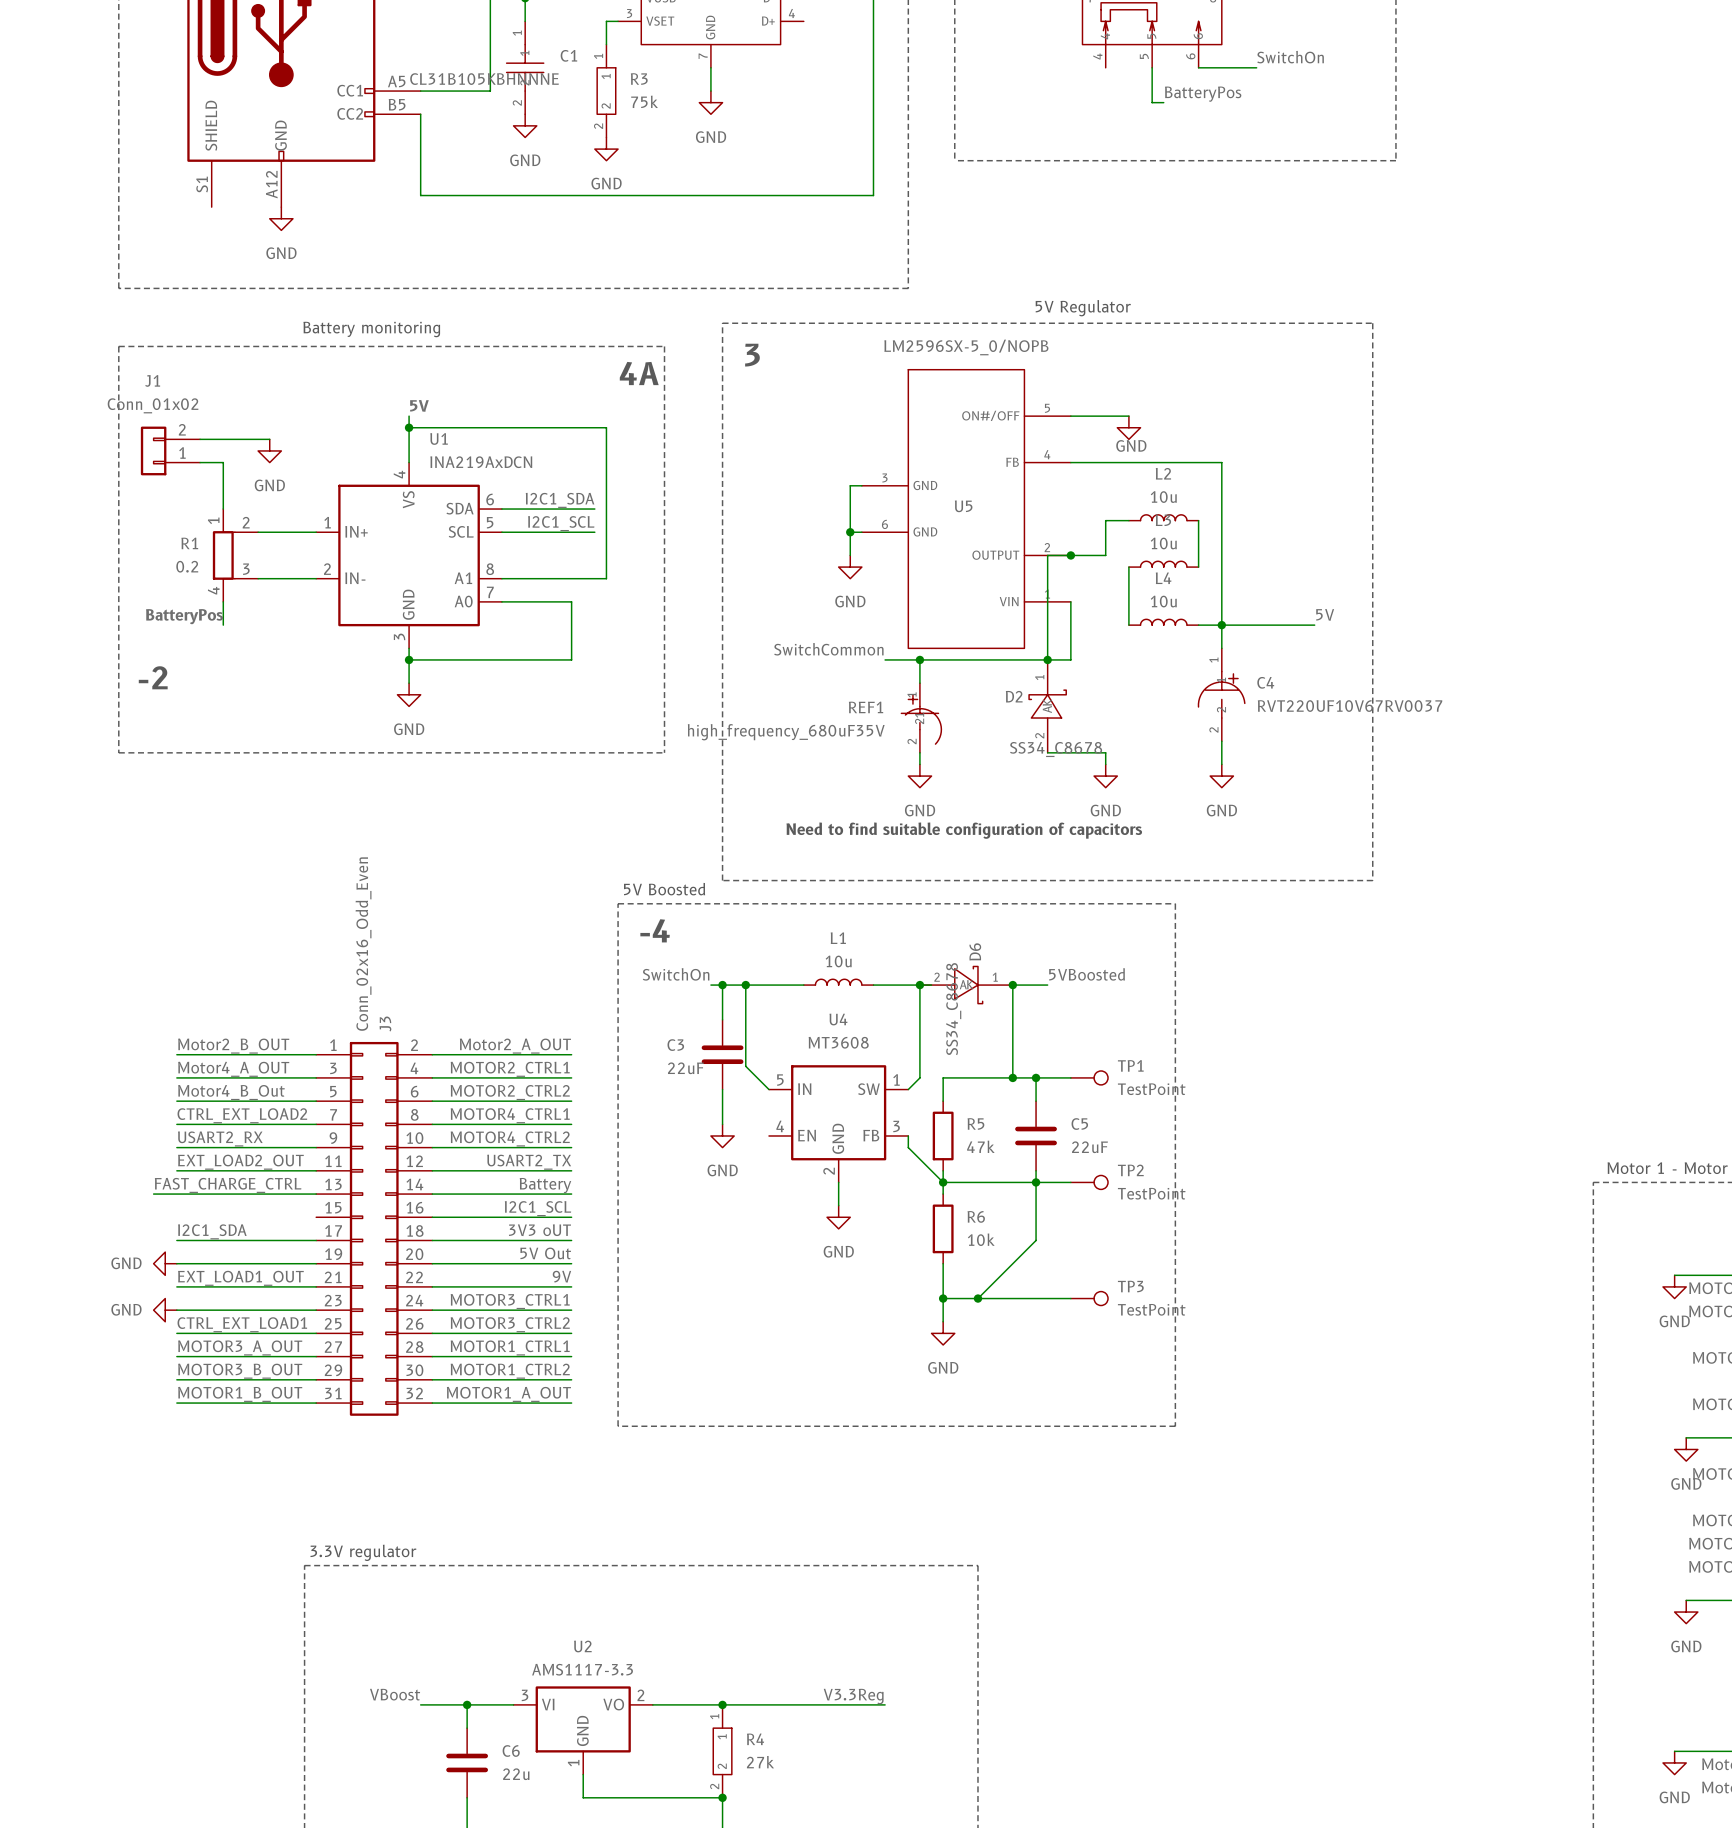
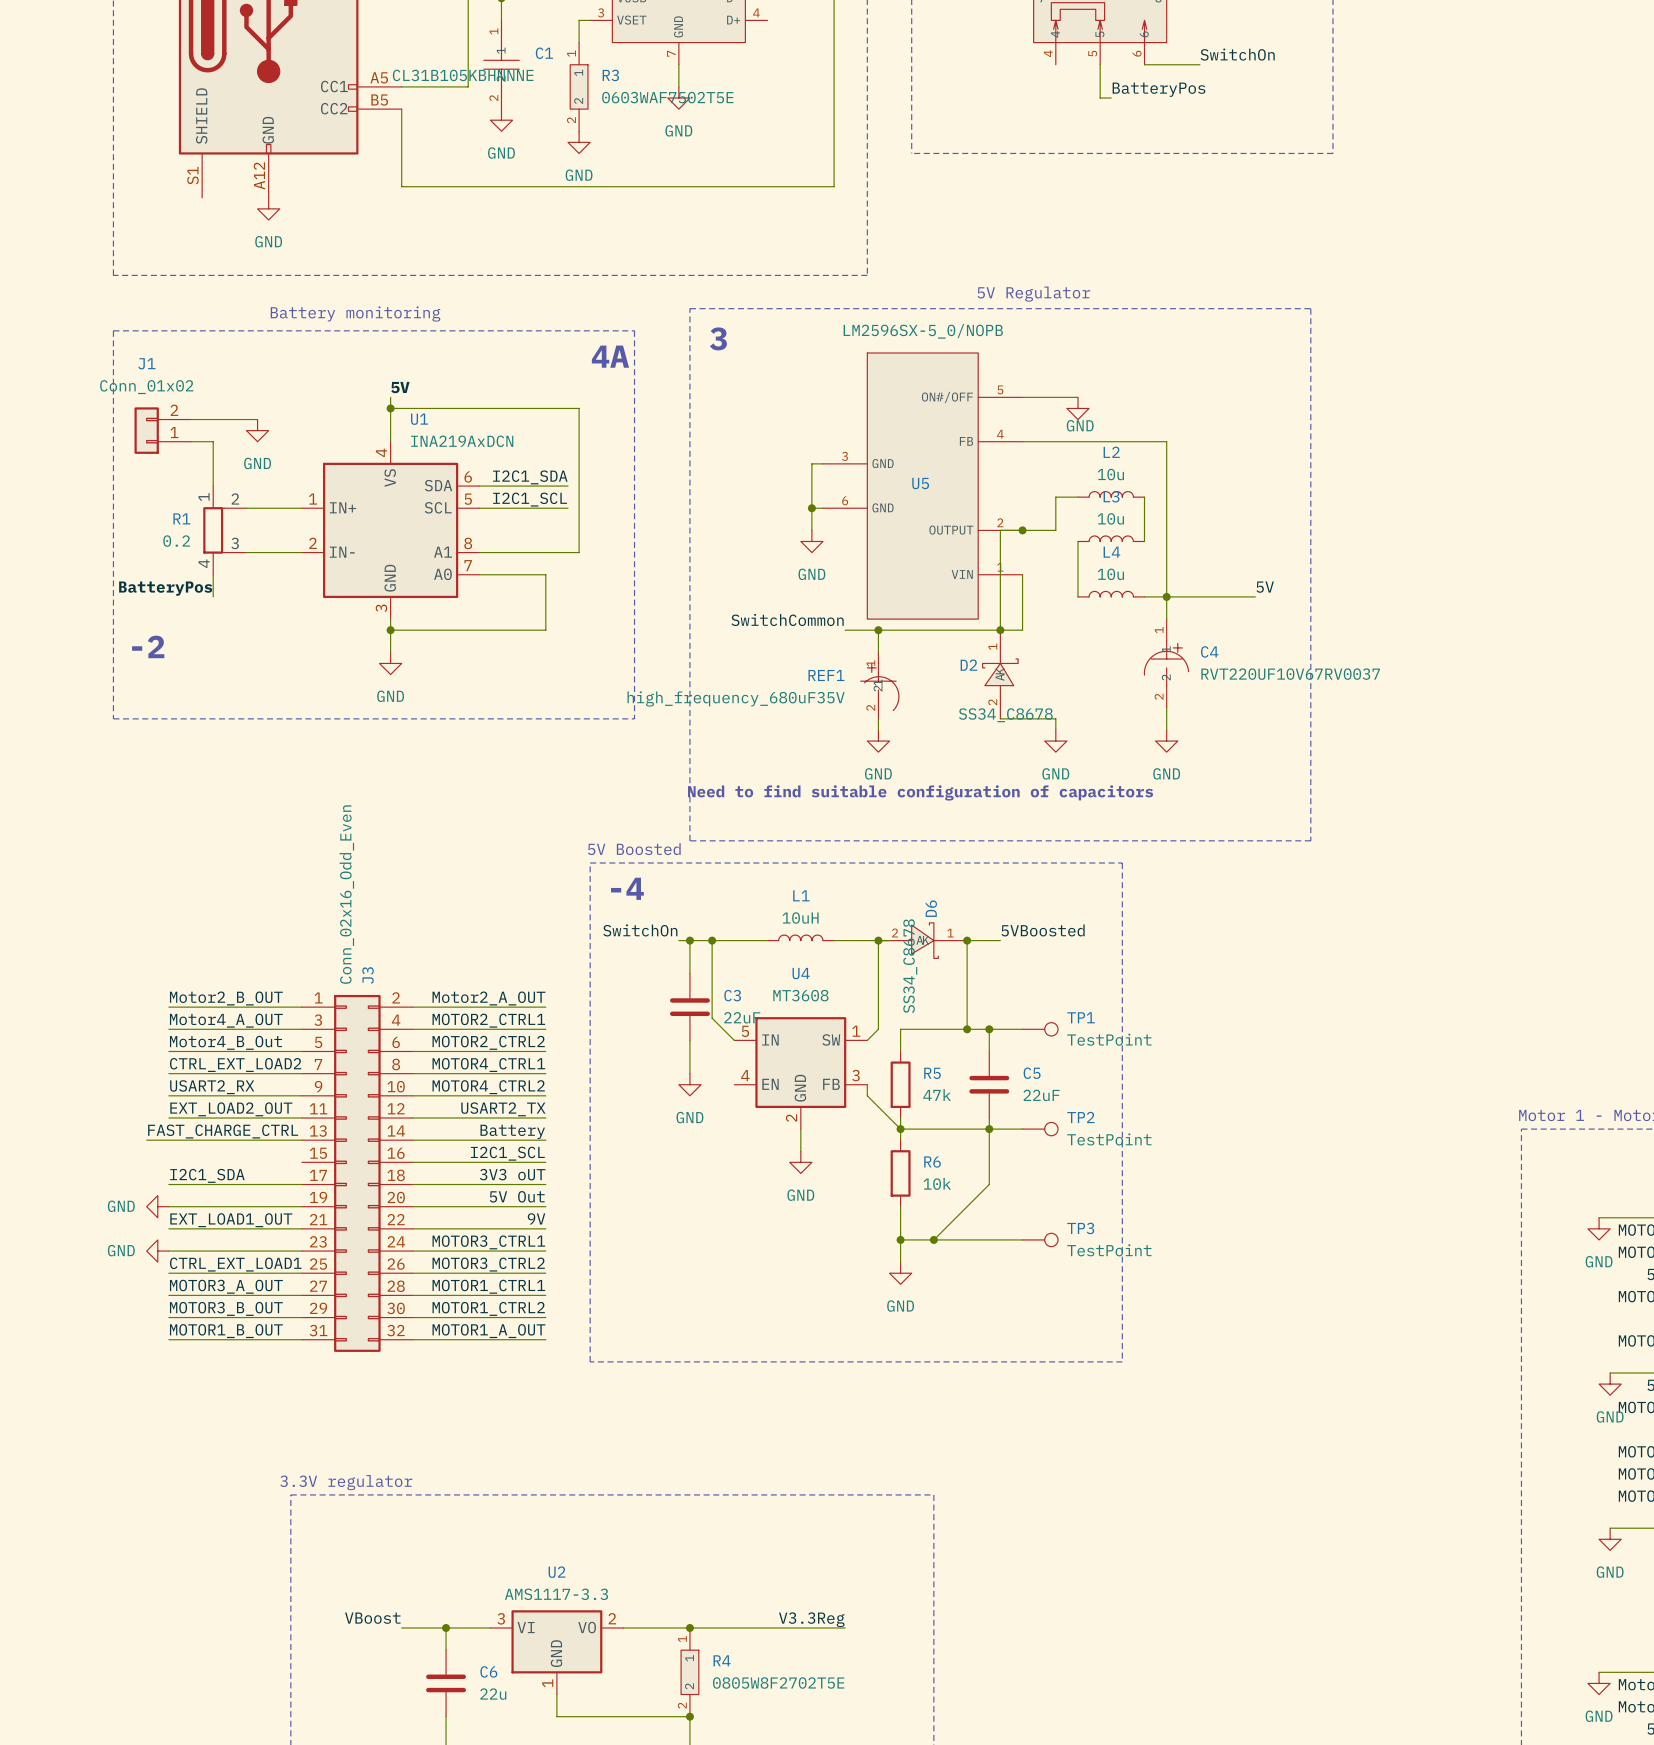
R3 value: 75k (644, 101) -> 0603WAF7502T5E (667, 97)
L1 value: 10u (838, 961) -> 10uH (800, 918)
C3 name position: C3 (675, 1045) -> C3 (732, 995)
C3 value position: 22uF (685, 1068) -> 22uF (742, 1017)
R4 value: 27k (760, 1762) -> 0805W8F2702T5E (778, 1683)

